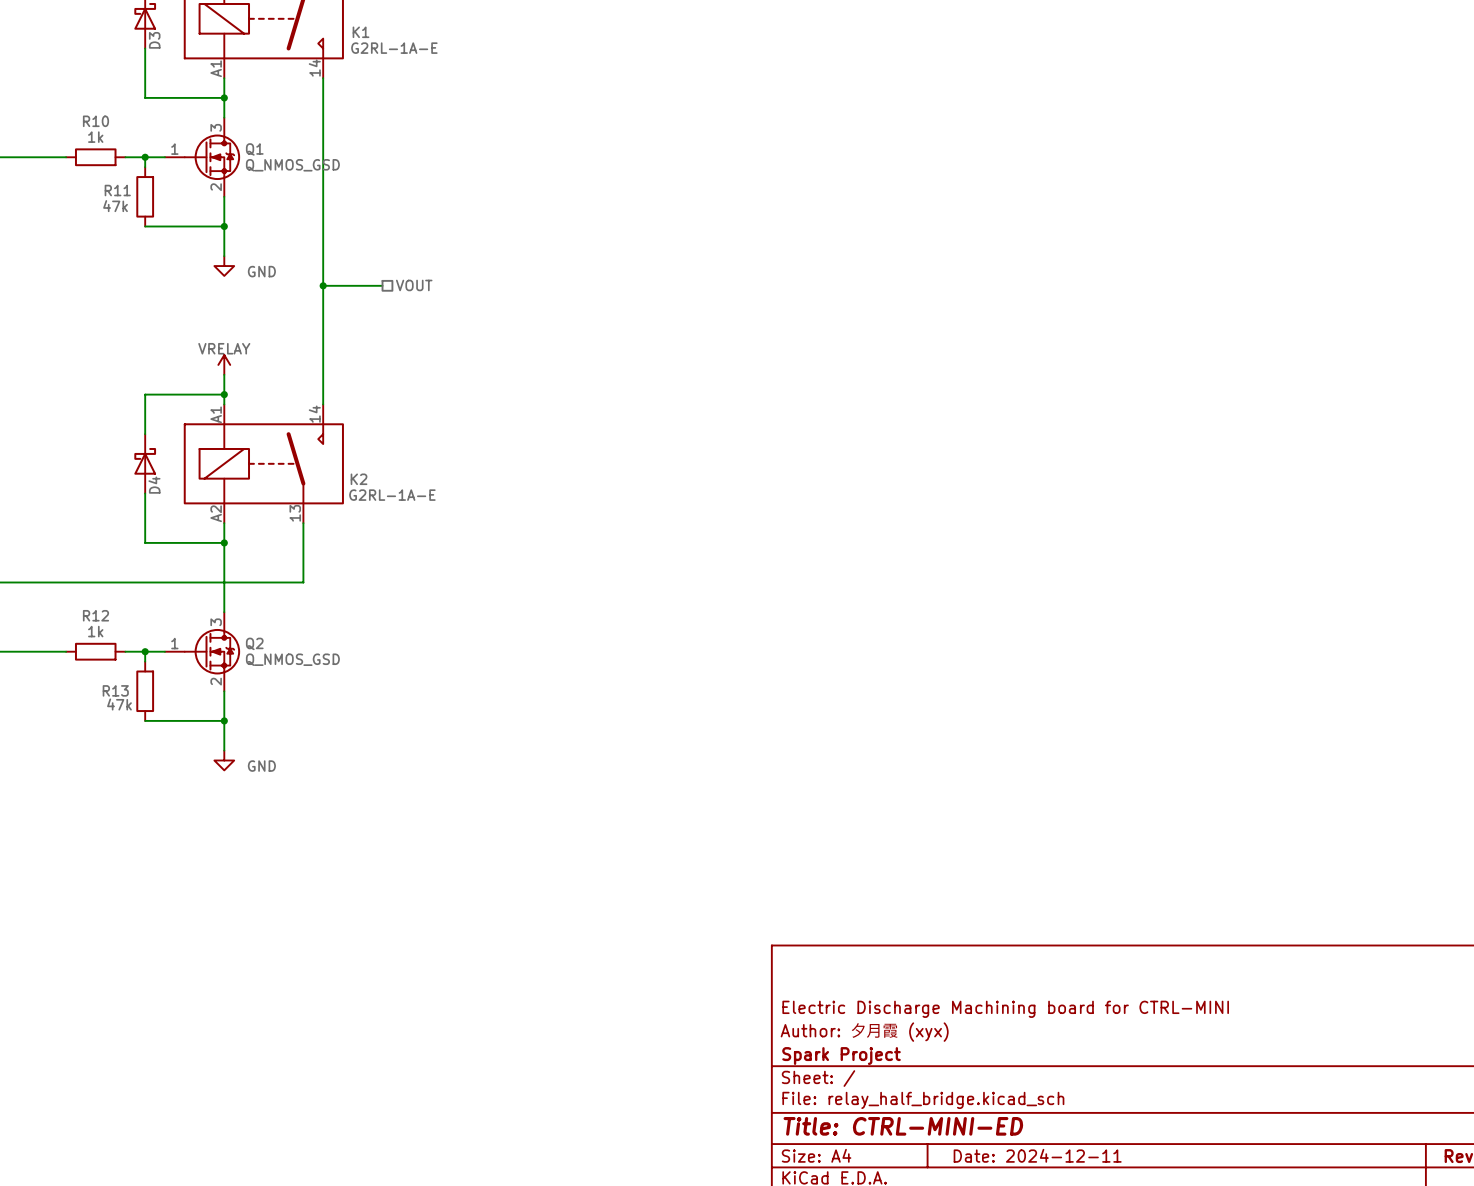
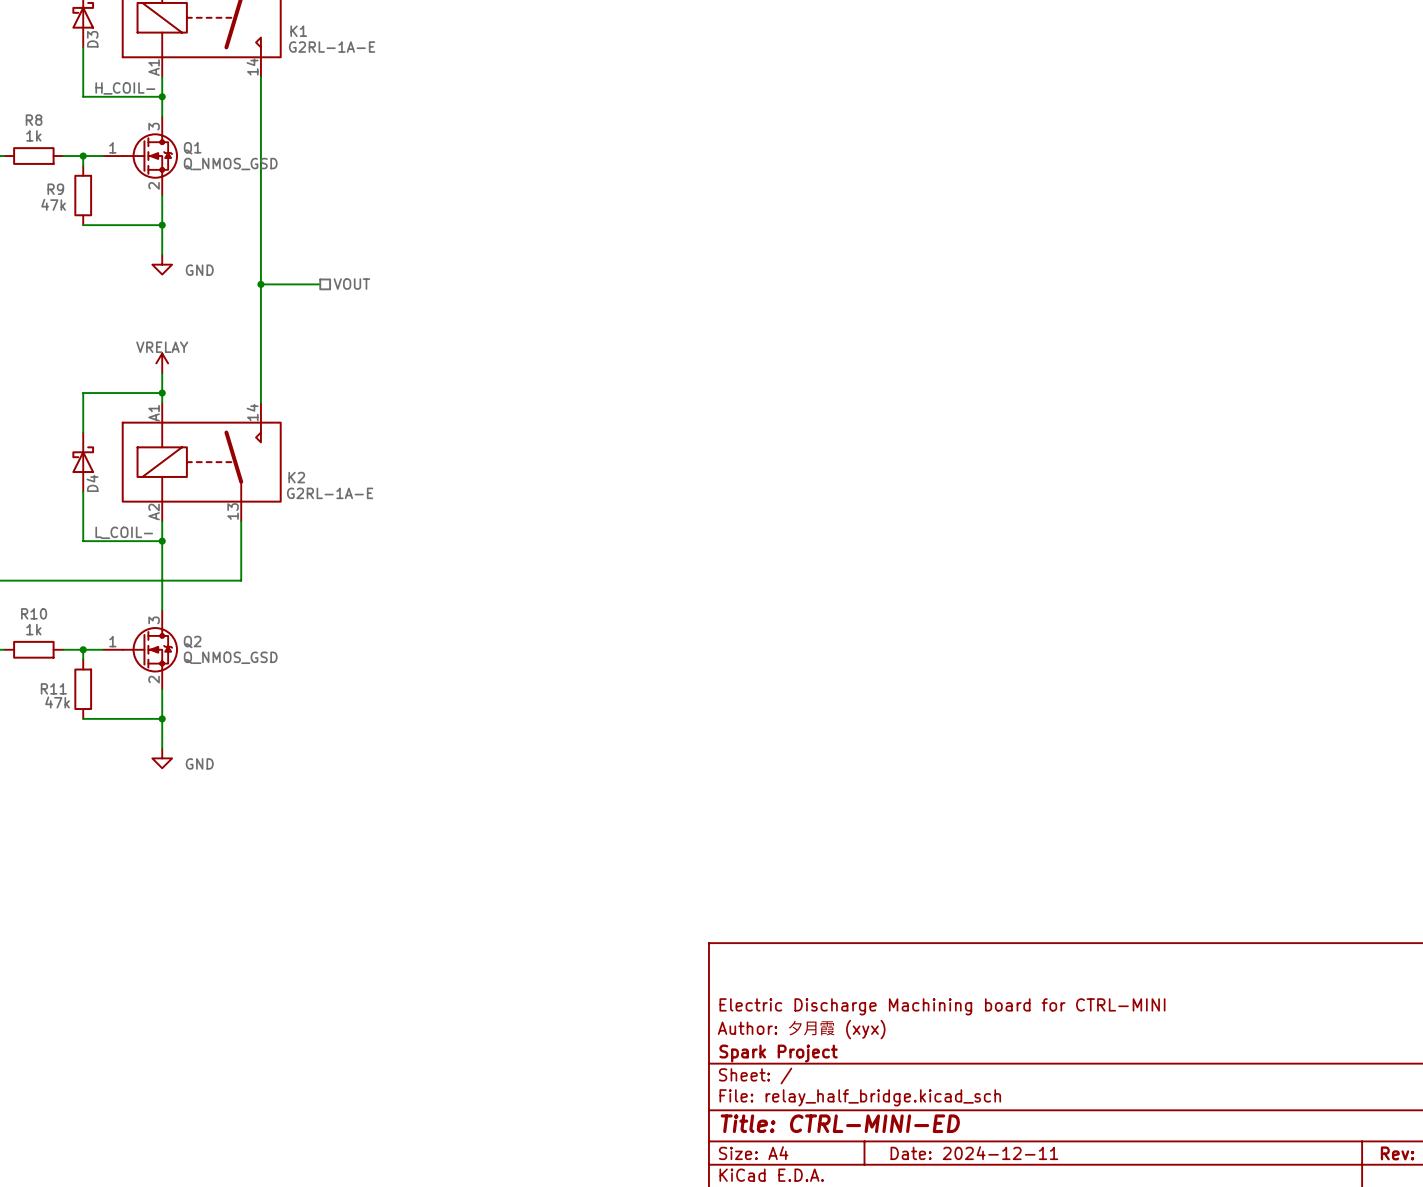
label: none -> H_COIL- (125, 88)
R10 name: R10 (95, 121) -> R8 (34, 120)
R11 name: R11 (117, 190) -> R9 (55, 189)
label: none -> L_COIL- (124, 532)
R12 name: R12 (95, 615) -> R10 (34, 613)
R13 name: R13 (115, 690) -> R11 (53, 688)

